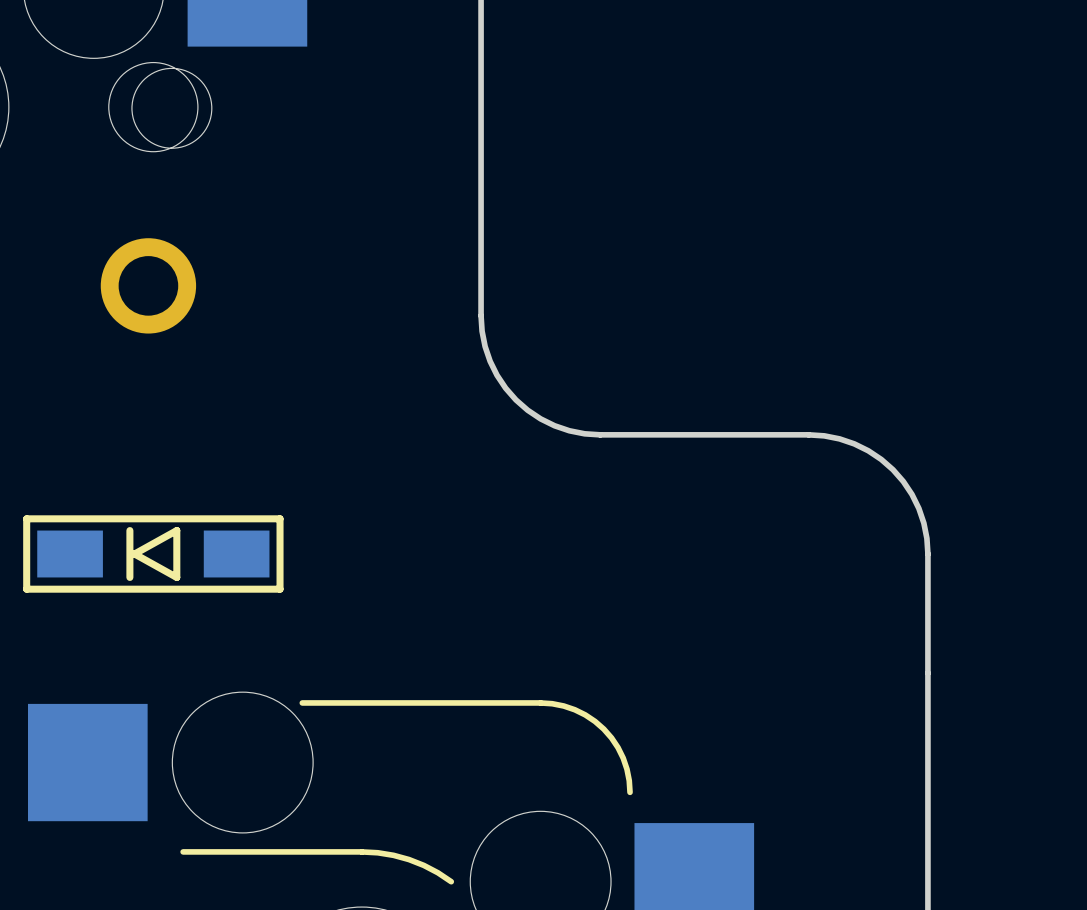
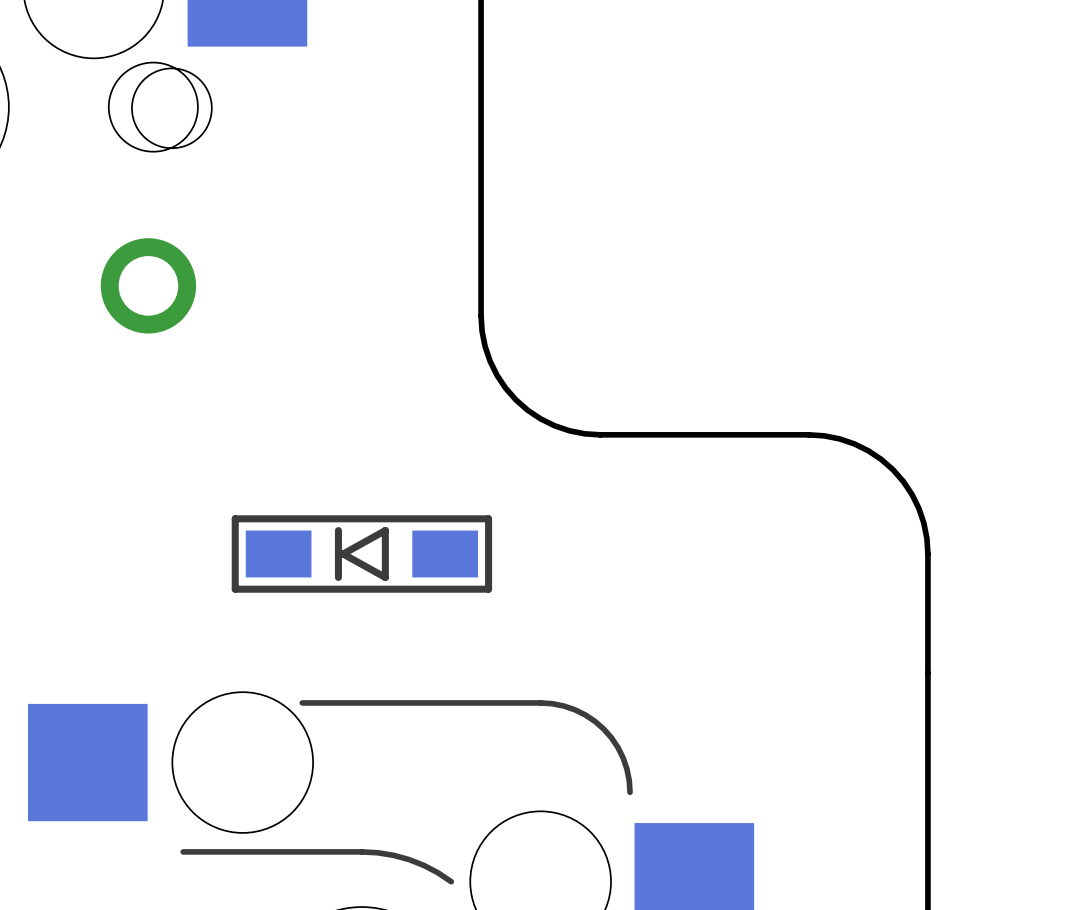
part position: (153, 554) -> (361, 554)

